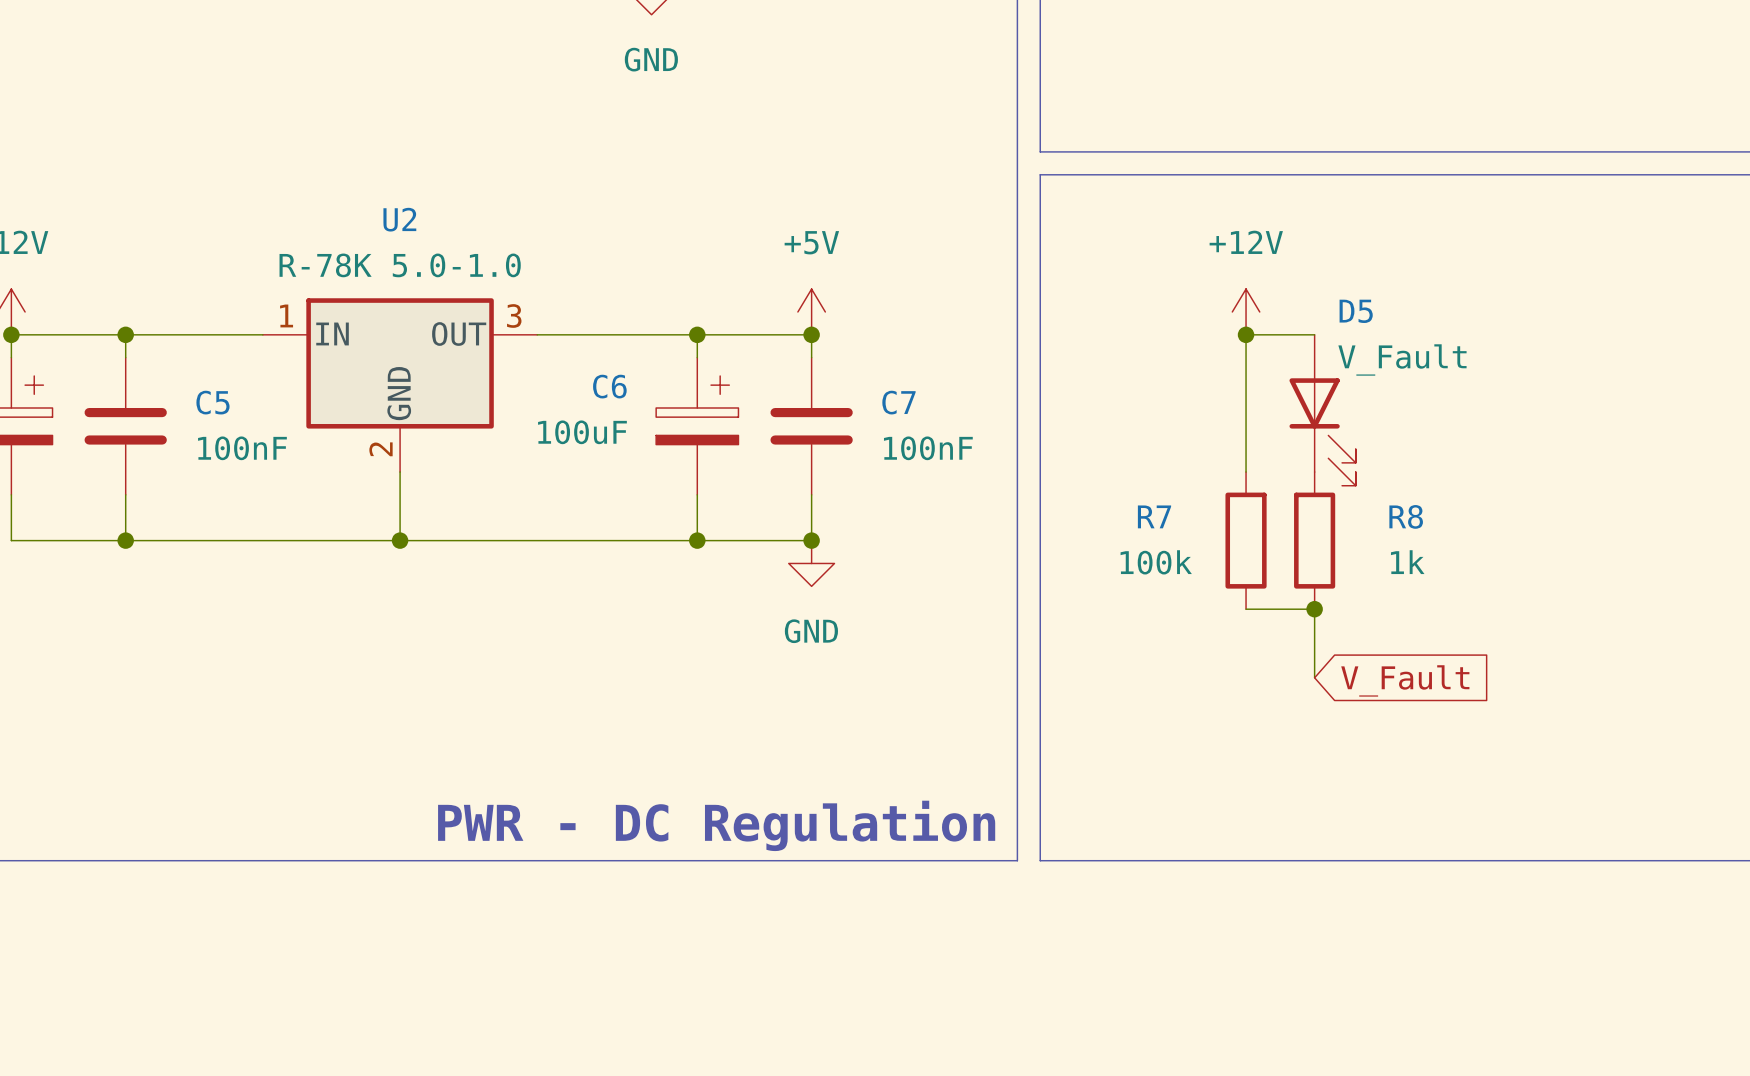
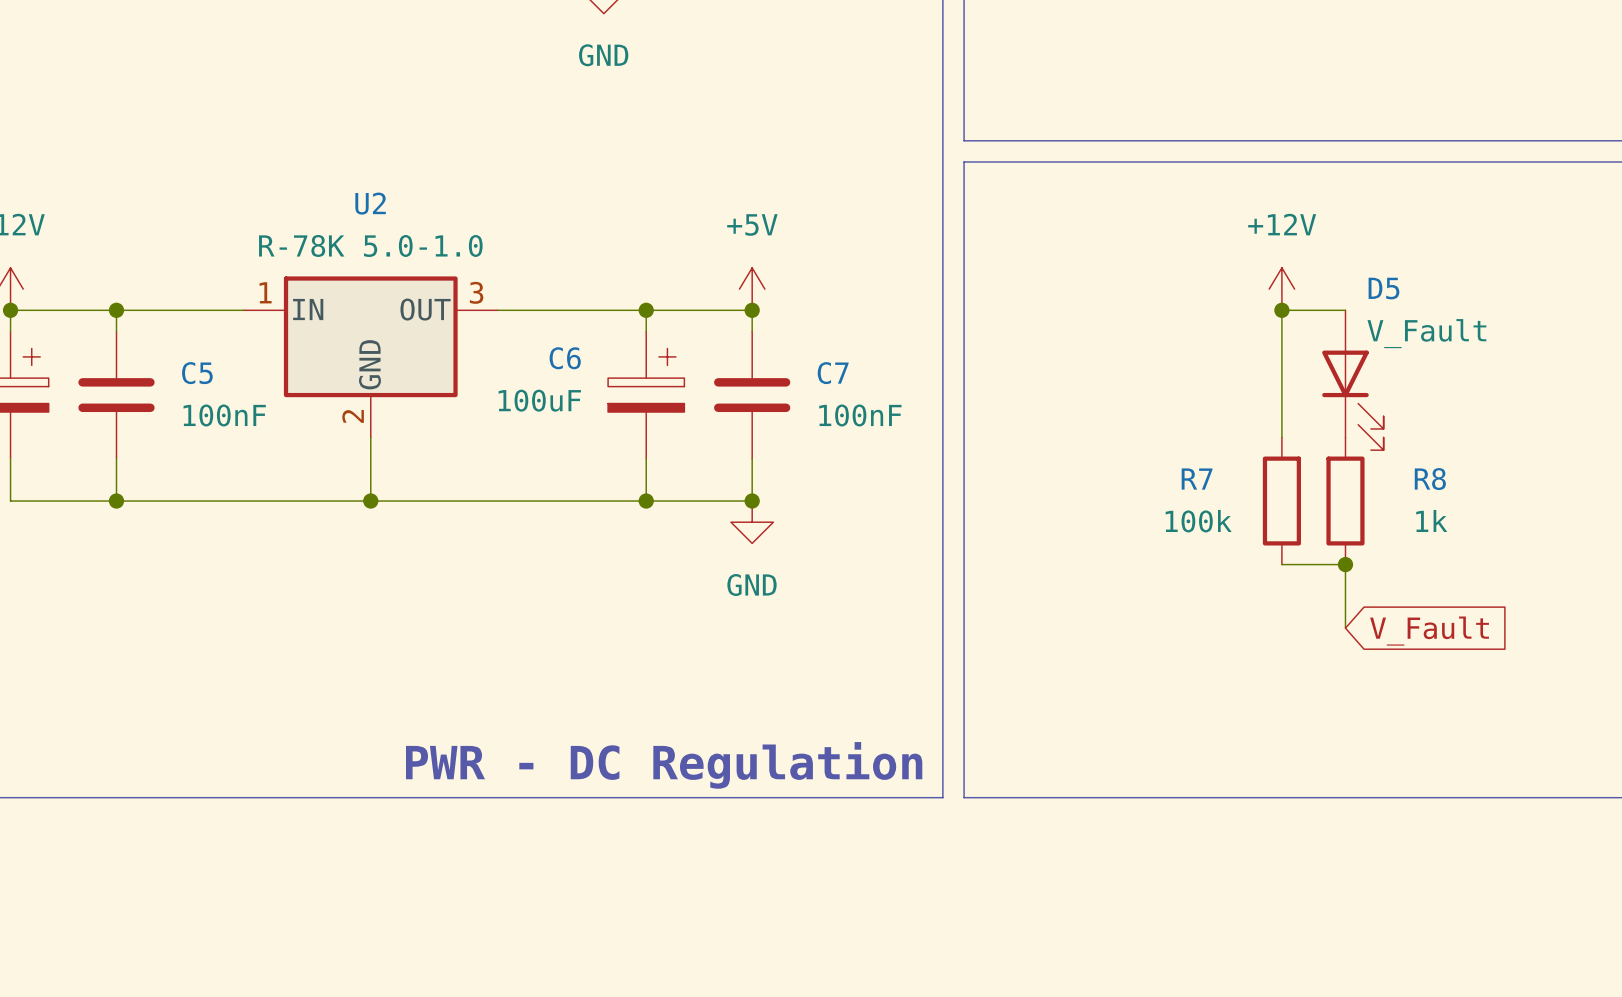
power symbol position: +12V (1246, 311) -> +12V (1281, 289)
junction: (1246, 334) -> none
wire: (1314, 334) (1246, 334) (1246, 472) -> (1345, 310) (1281, 310) (1281, 437)
junction: none -> (1281, 310)
D5 position: (1322, 410) -> (1352, 380)
R7 position: (1246, 540) -> (1281, 501)
R8 position: (1314, 540) -> (1345, 501)
wire: (1246, 609) (1314, 609) (1314, 677) -> (1281, 564) (1345, 564) (1345, 628)
junction: (1314, 609) -> none
junction: none -> (1345, 564)
global label position: V_Fault (1405, 680) -> V_Fault (1429, 631)

